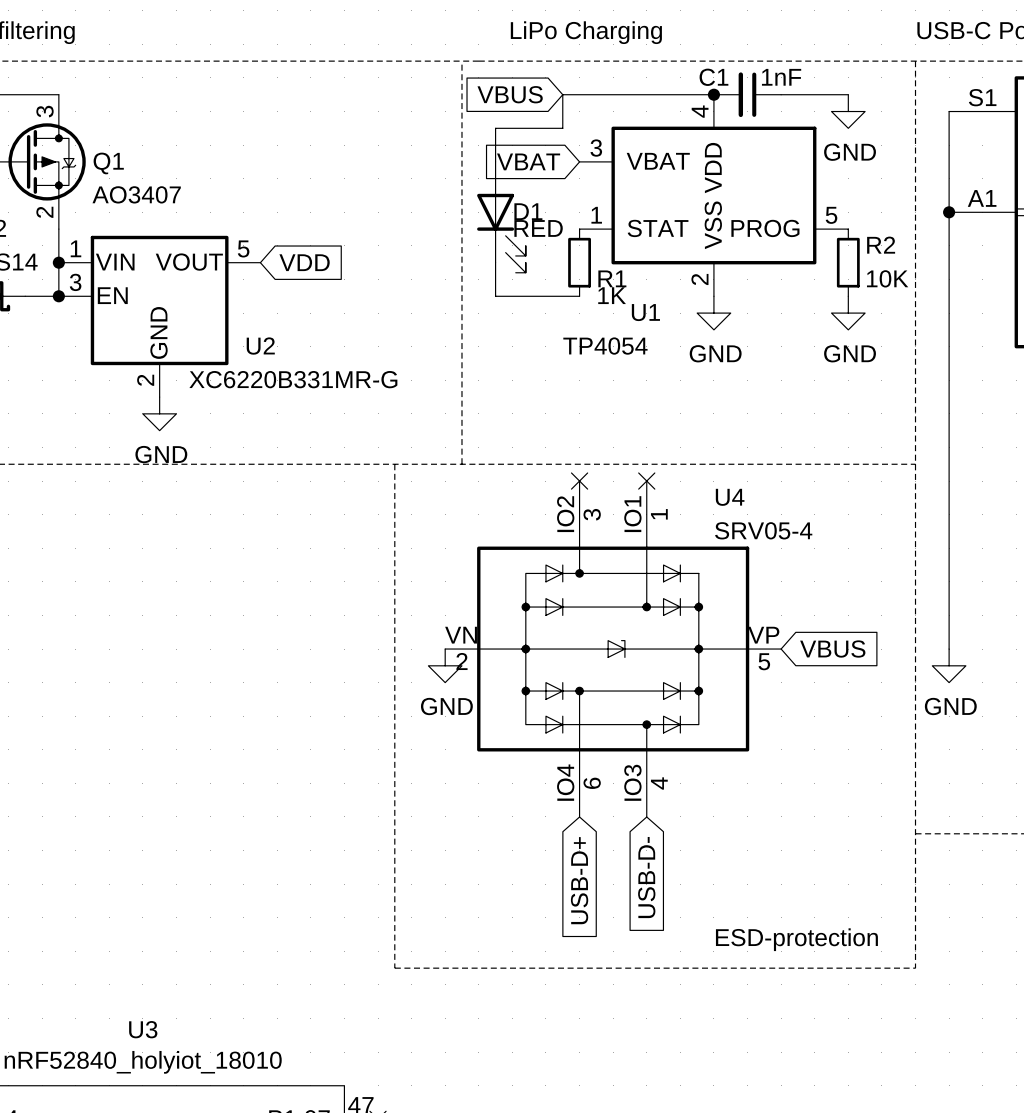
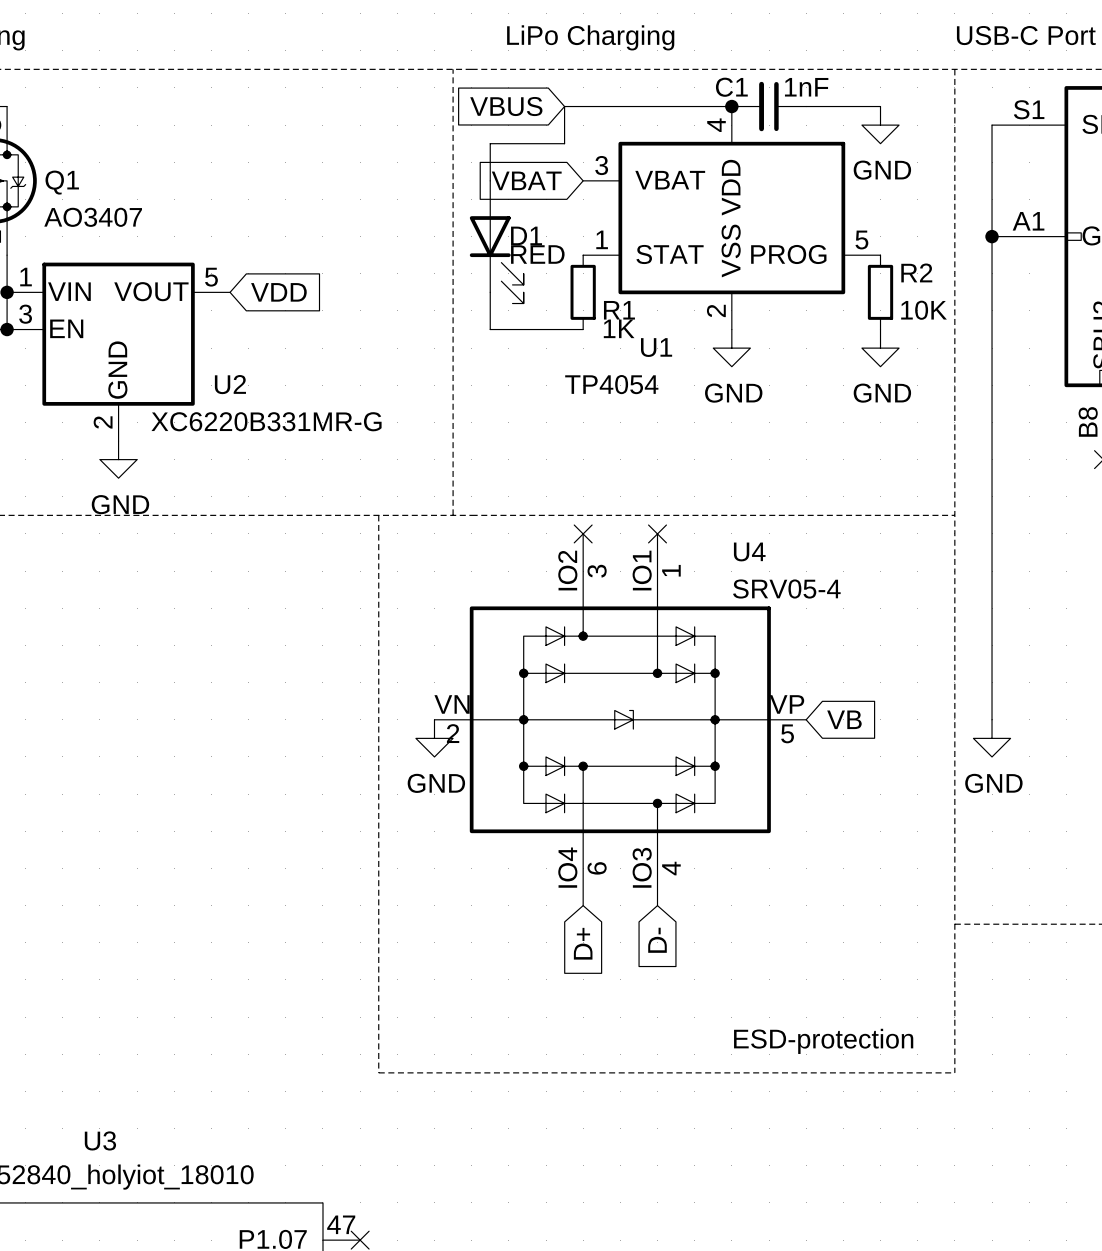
global label: VBUS (832, 649) -> VB (844, 719)
global label: USB-D- (646, 877) -> D- (657, 940)
global label: USB-D+ (579, 880) -> D+ (583, 943)

